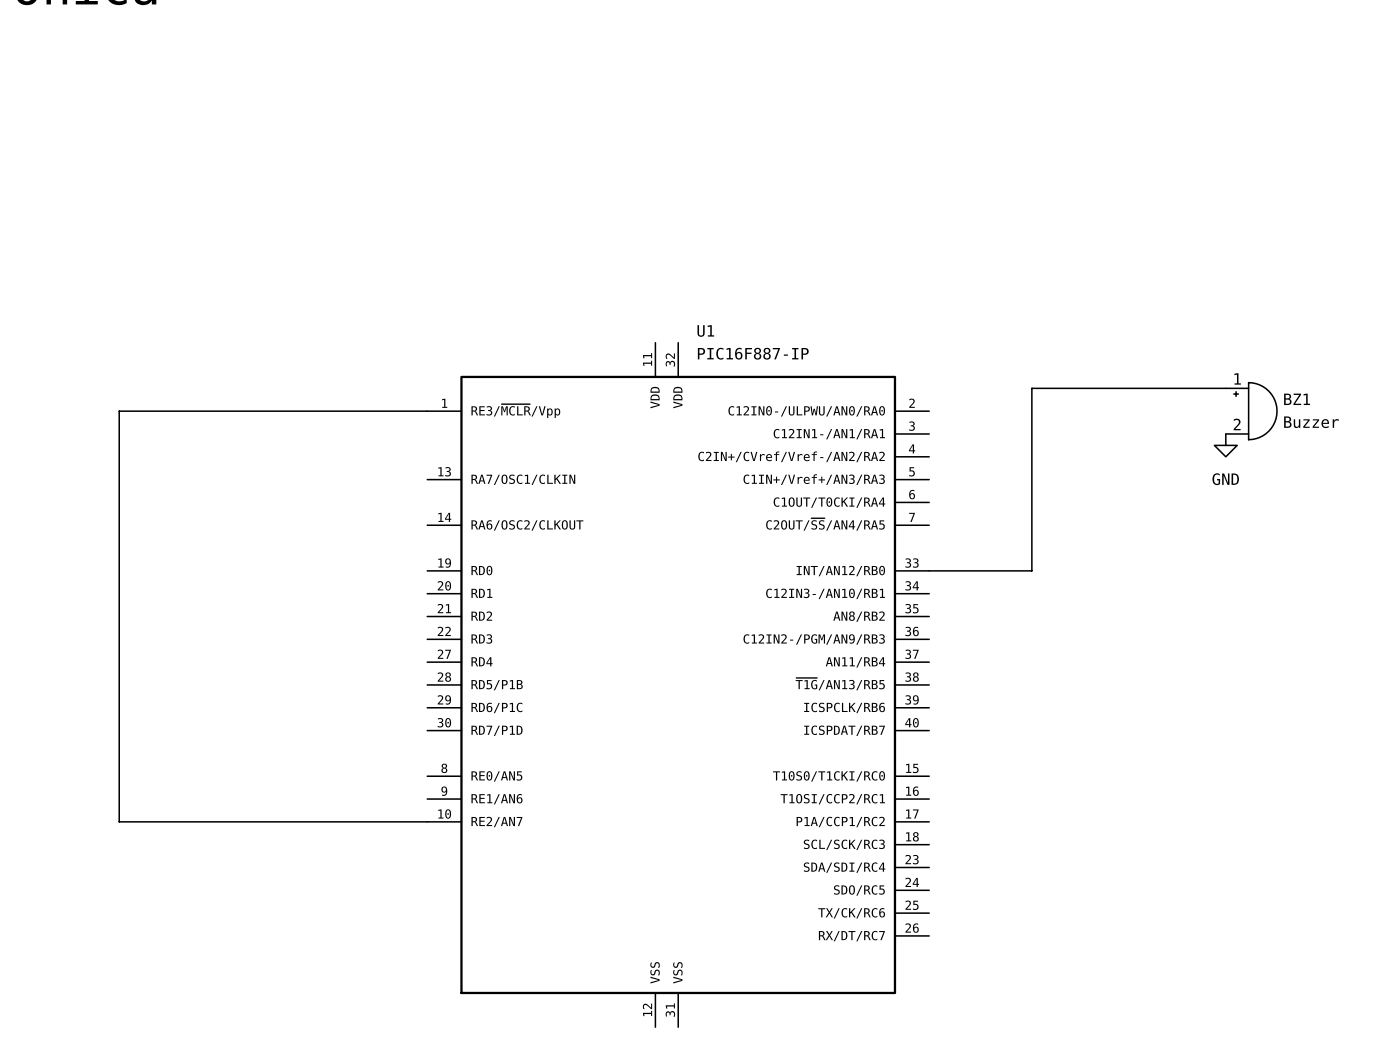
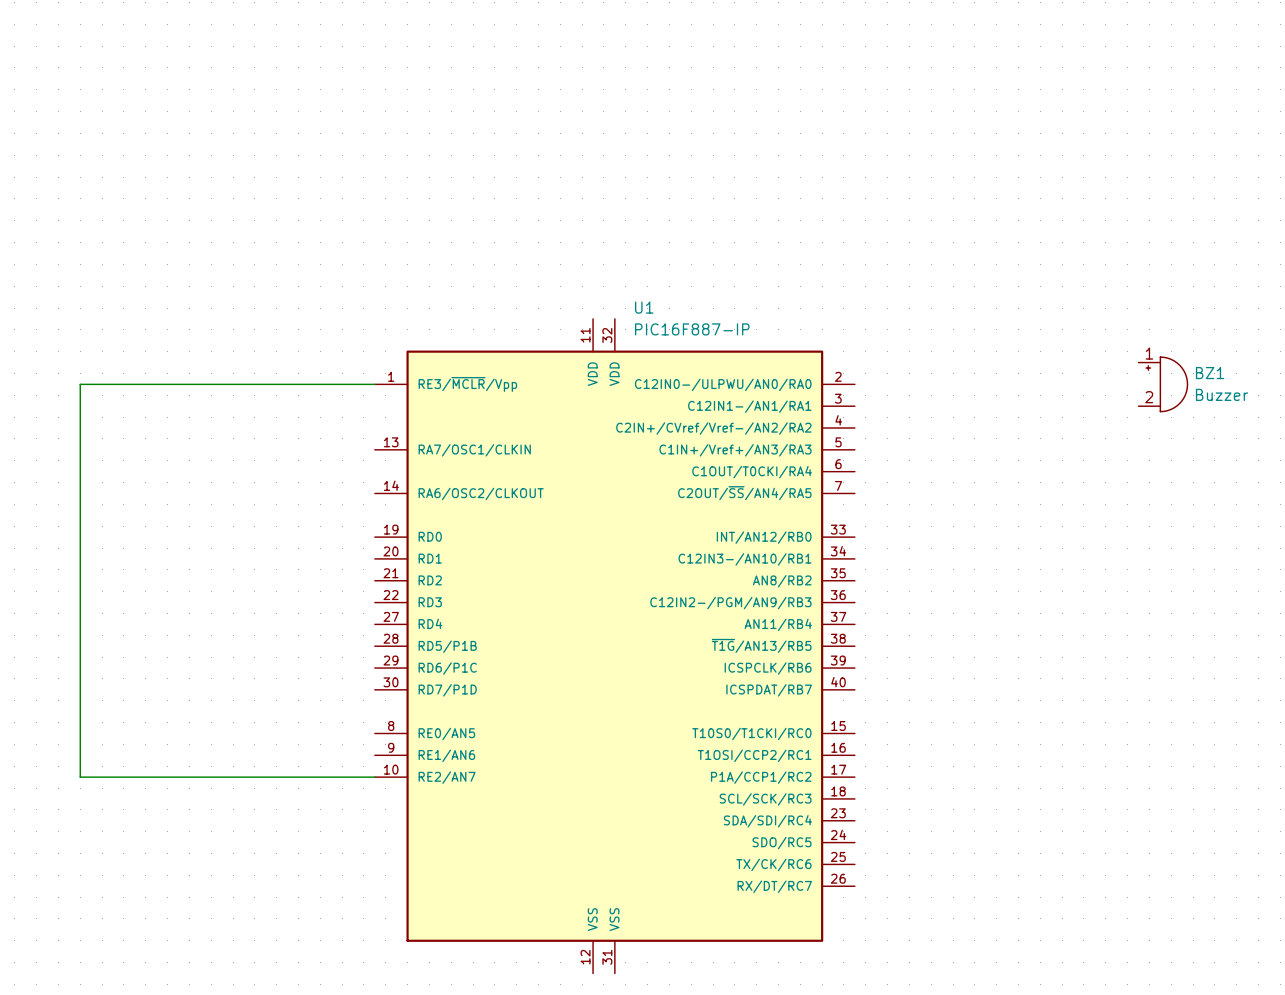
wire: (1225, 388) (1031, 388) (1031, 570) (929, 570) -> none
power symbol: GND (1225, 445) -> none

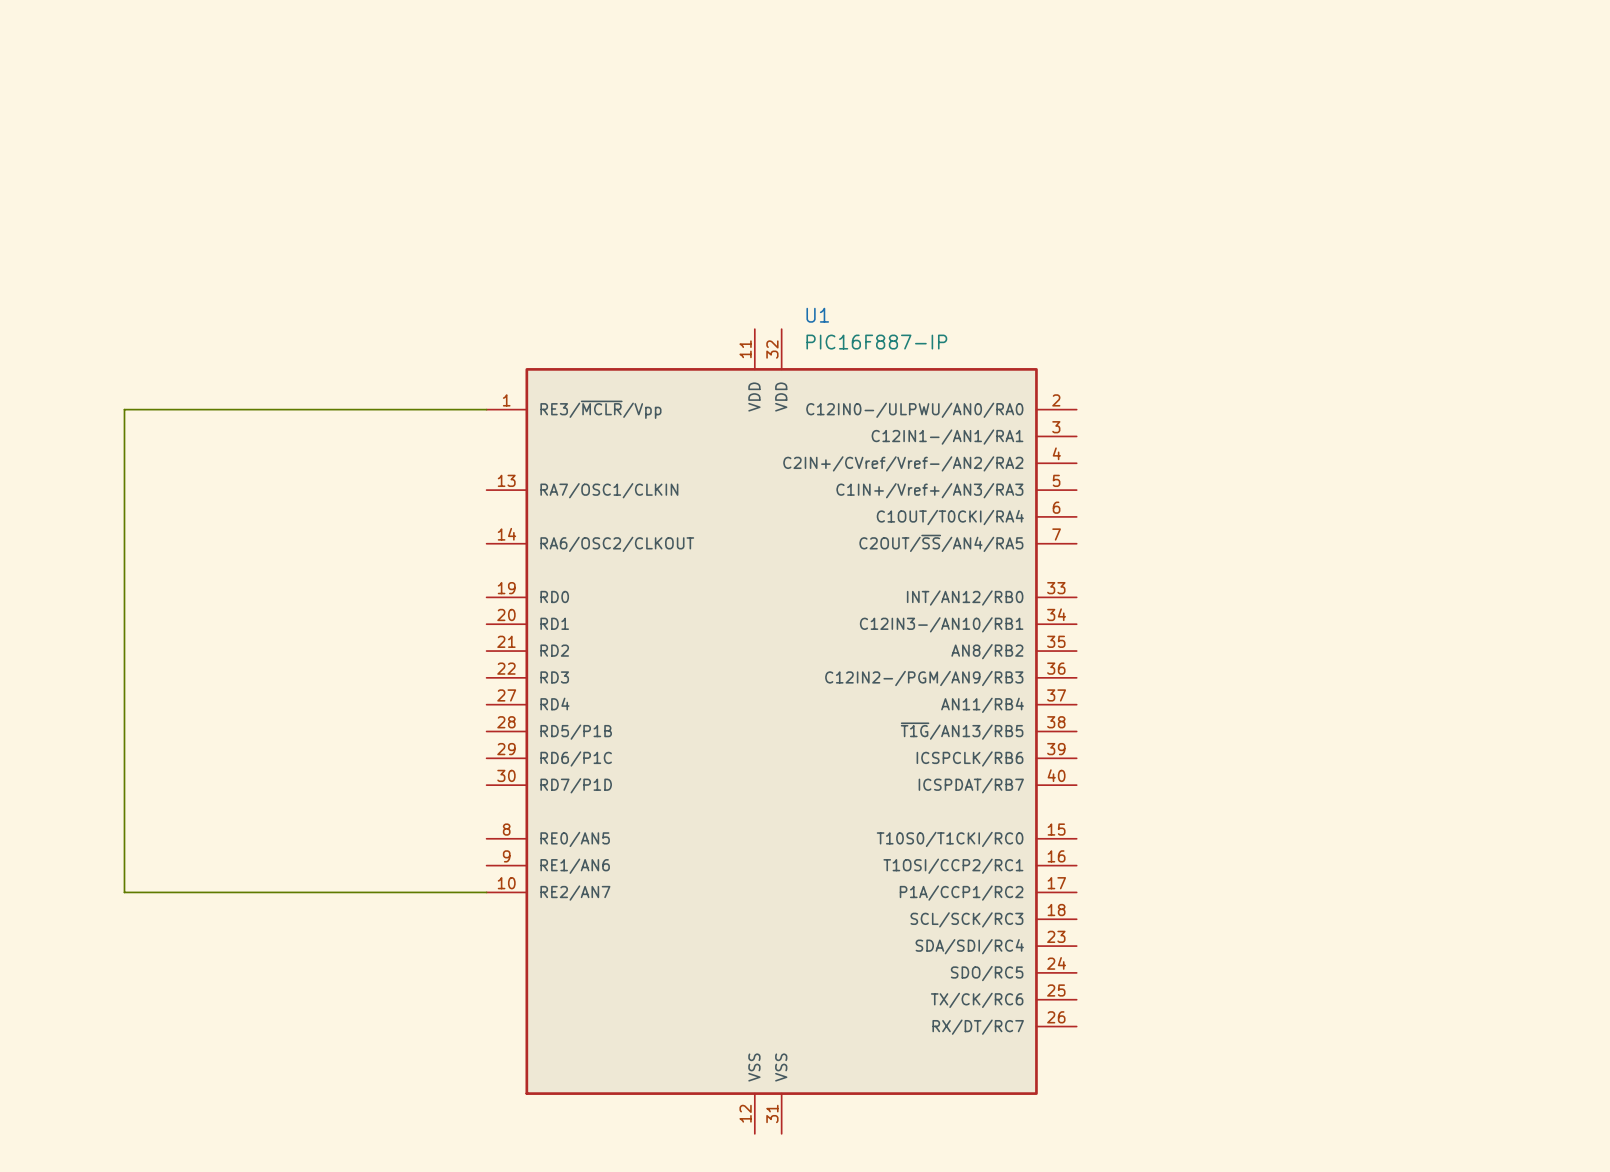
BZ1: Buzzer (1163, 384) -> none

